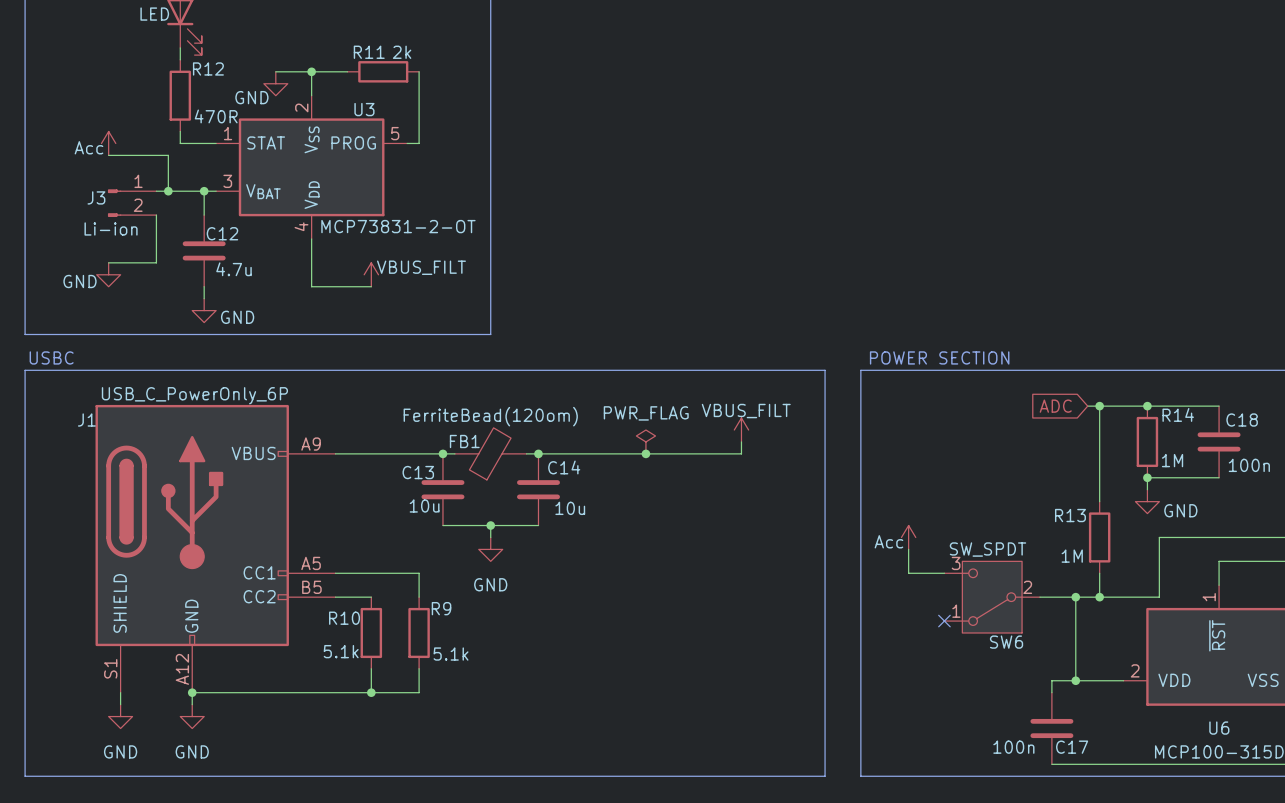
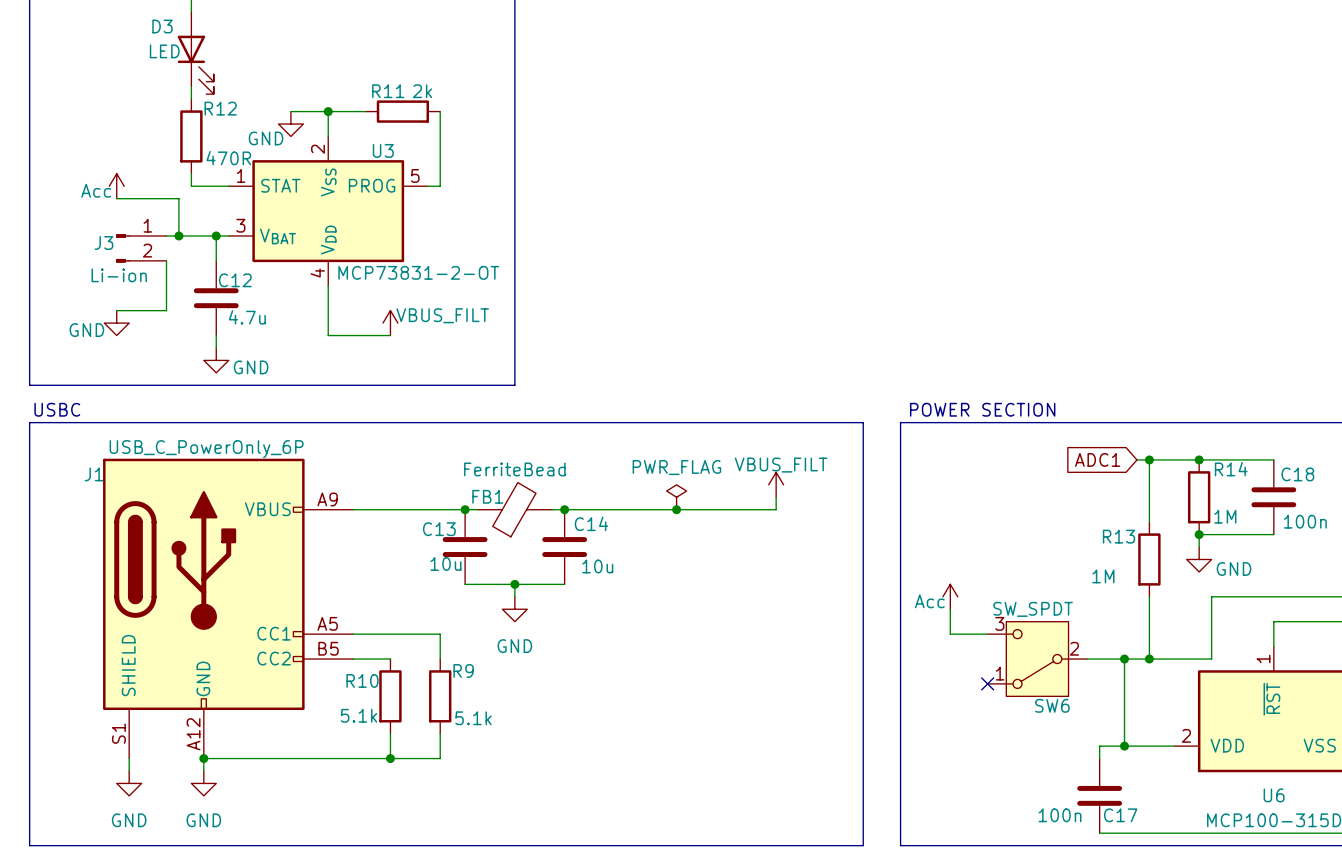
global label: ADC (1055, 406) -> ADC1 (1097, 459)
FB1 value: FerriteBead(120om) (490, 416) -> FerriteBead (514, 469)
wire: (1099, 465) (1099, 501) -> (1149, 596) (1149, 634)
R13 position: (1099, 537) -> (1149, 559)
R13 value position: 1M (1072, 556) -> 1M (1103, 576)

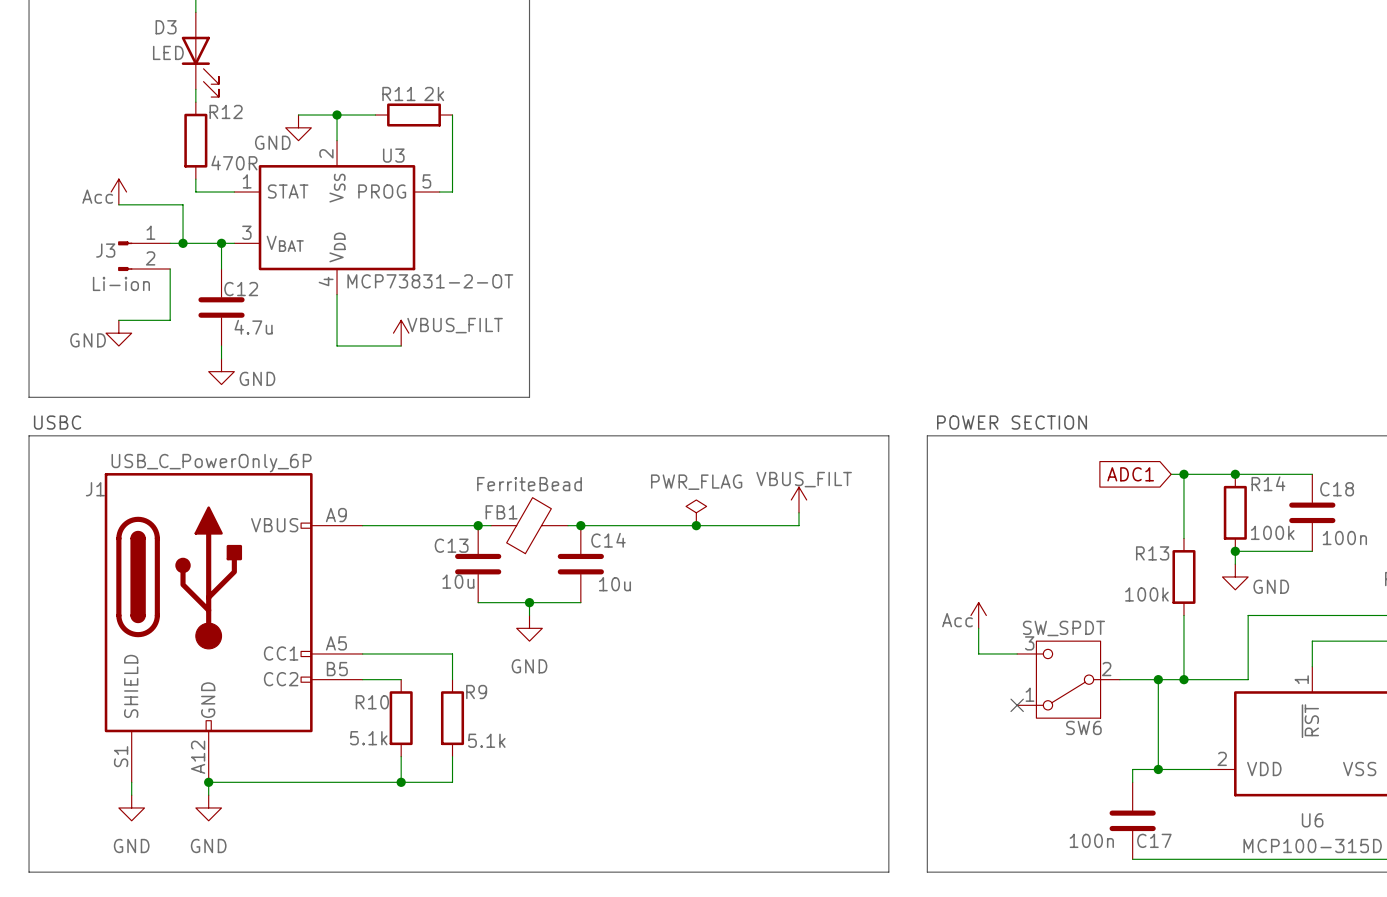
R14 value: 1M (1225, 516) -> 100k (1272, 532)
R13 value: 1M (1103, 576) -> 100k (1146, 594)

